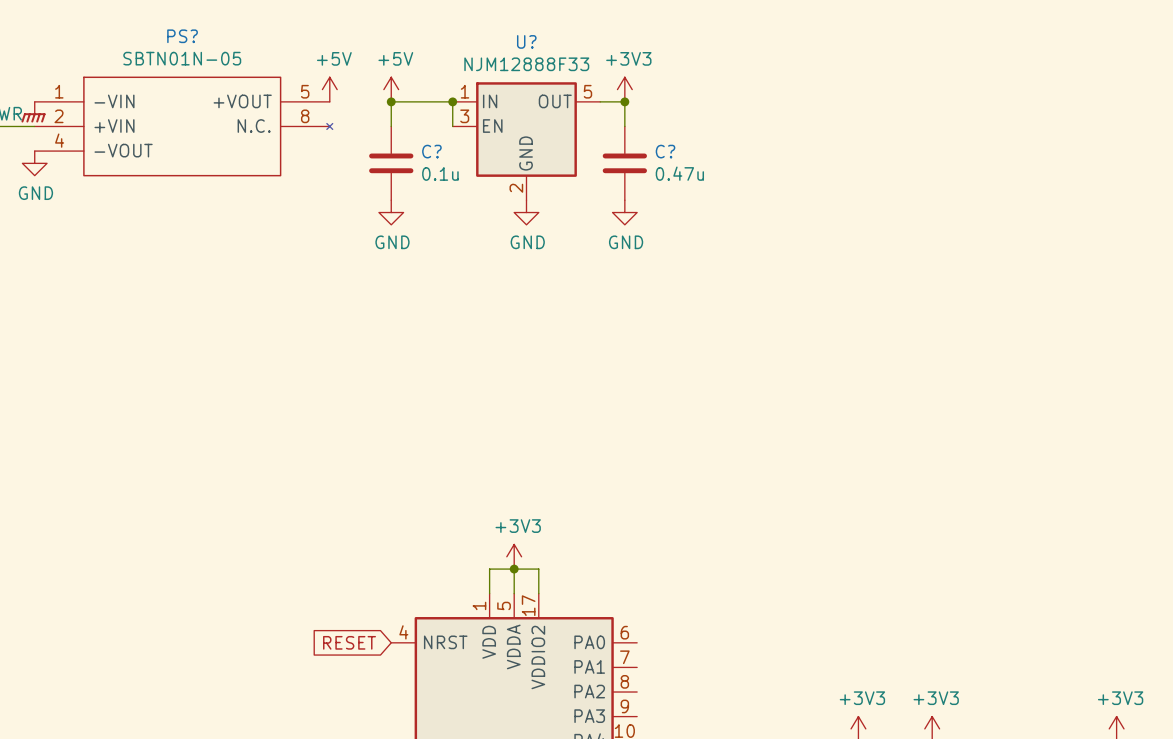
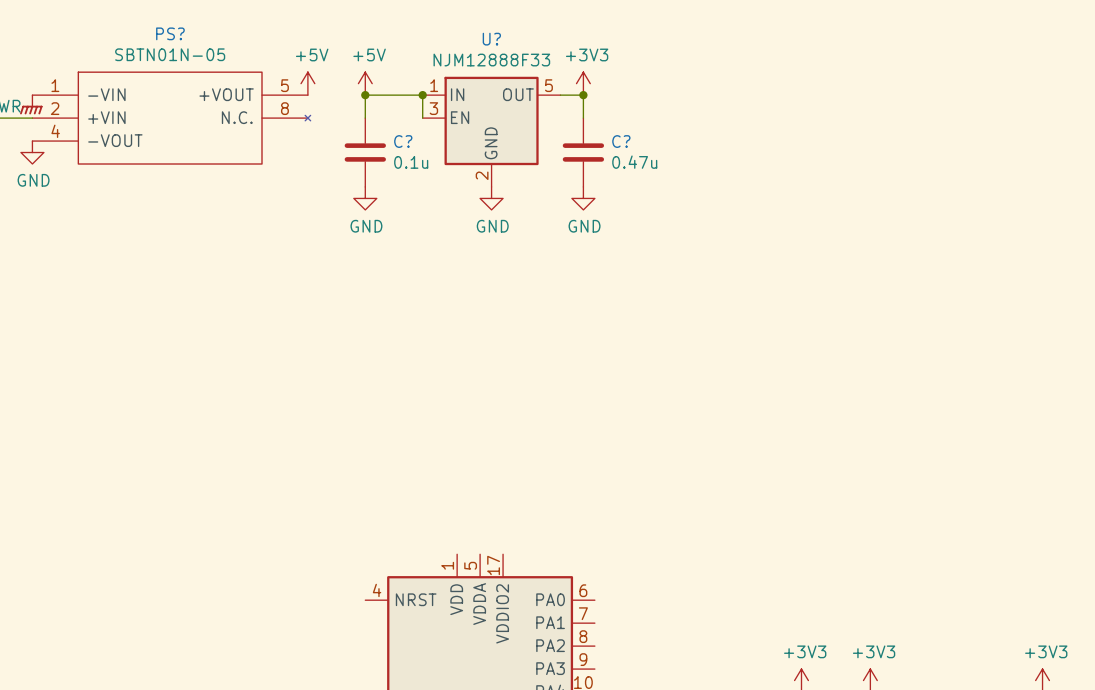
power symbol: +3V3 (514, 556) -> none
wire: (514, 569) (514, 593) -> none
junction: (514, 569) -> none
wire: (489, 593) (489, 569) (538, 569) (538, 593) -> none
global label: RESET (349, 642) -> none

